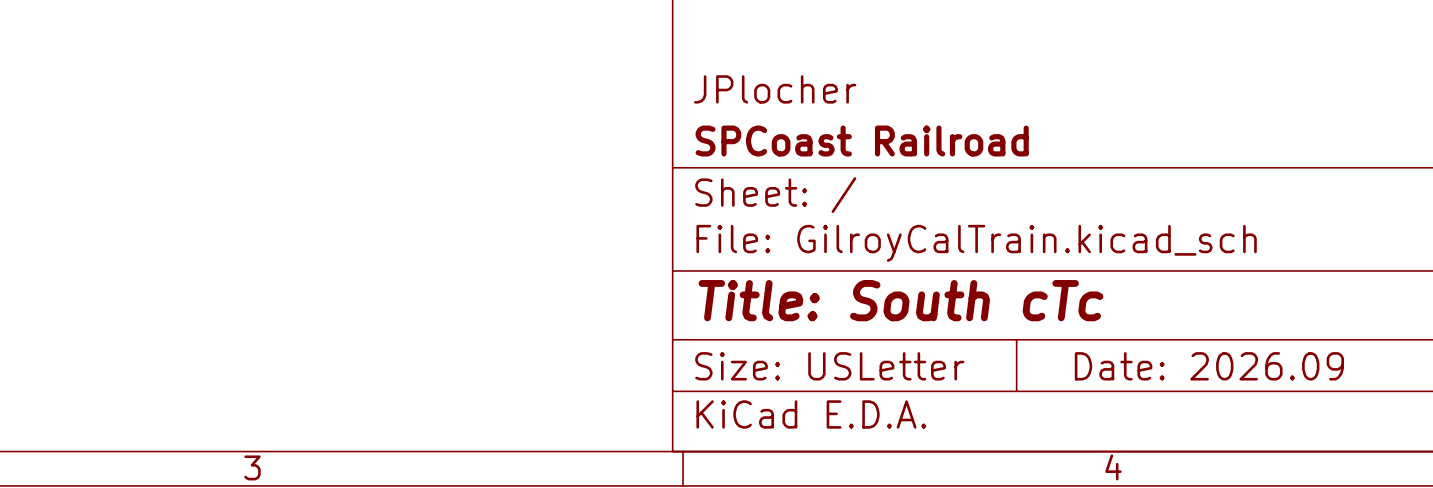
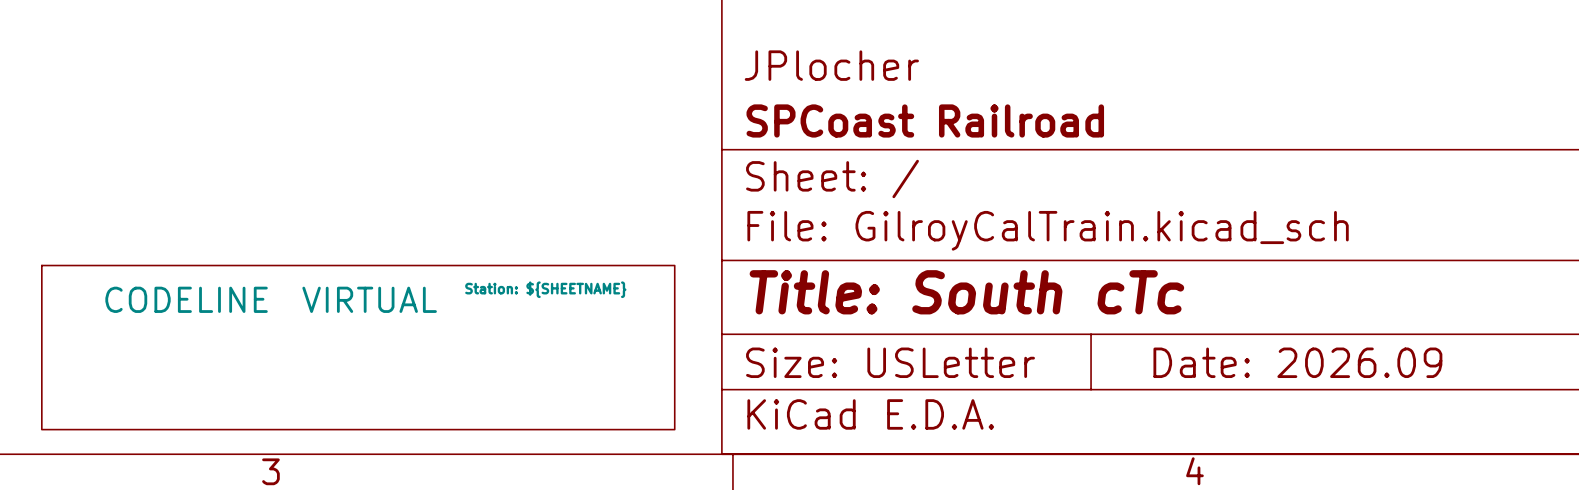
part: none -> VIRTUAL (358, 347)

